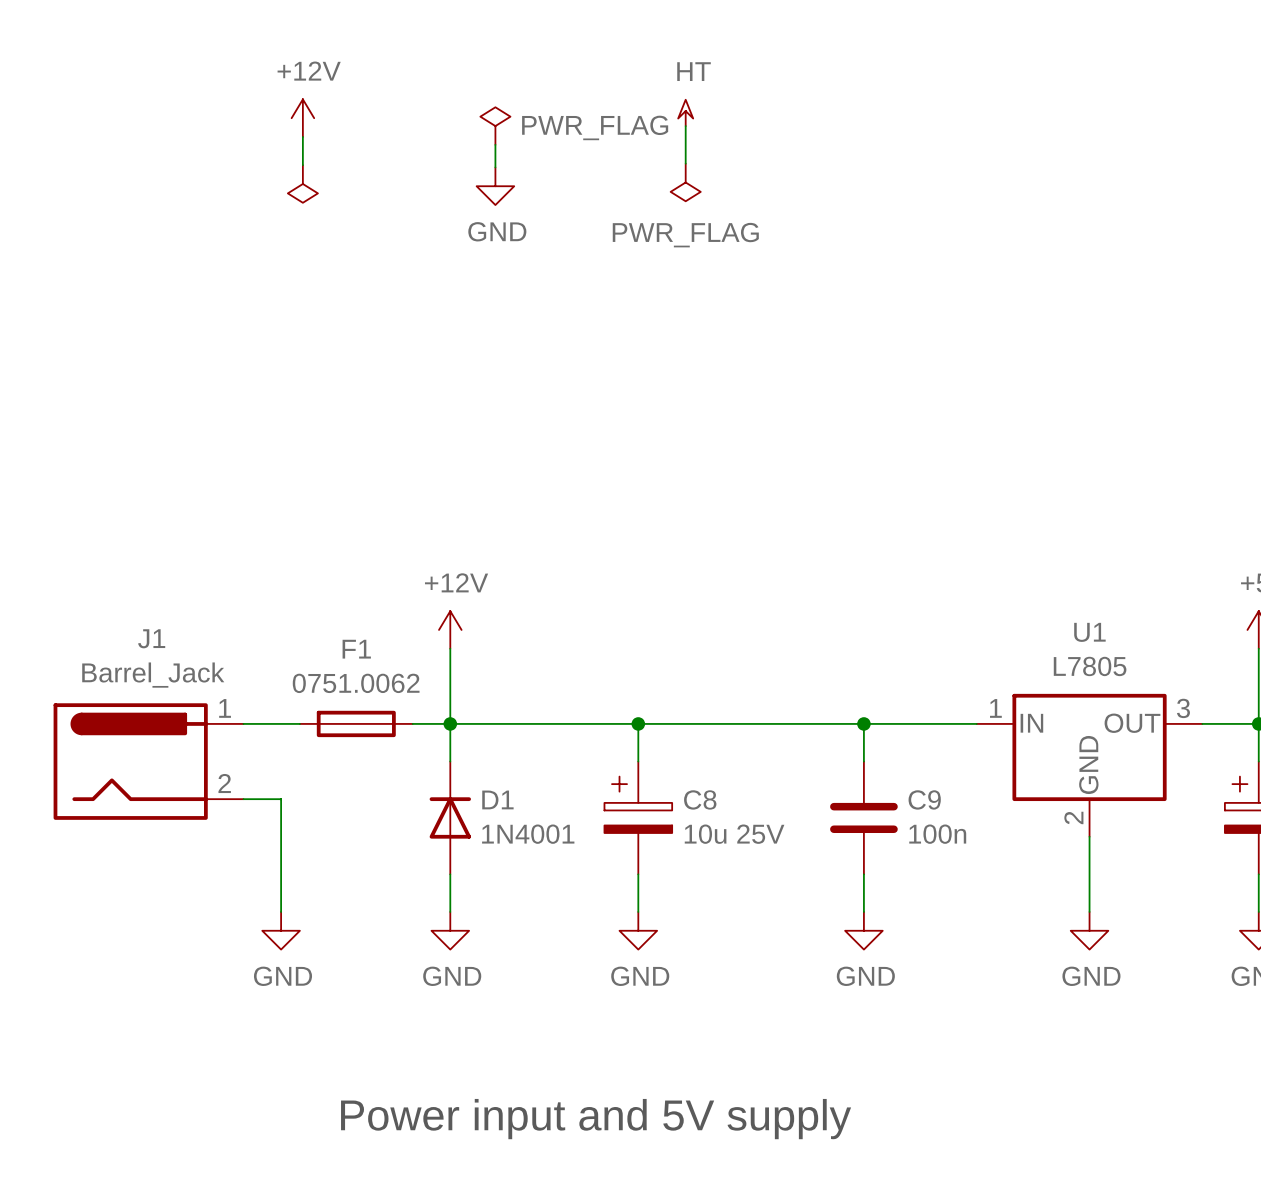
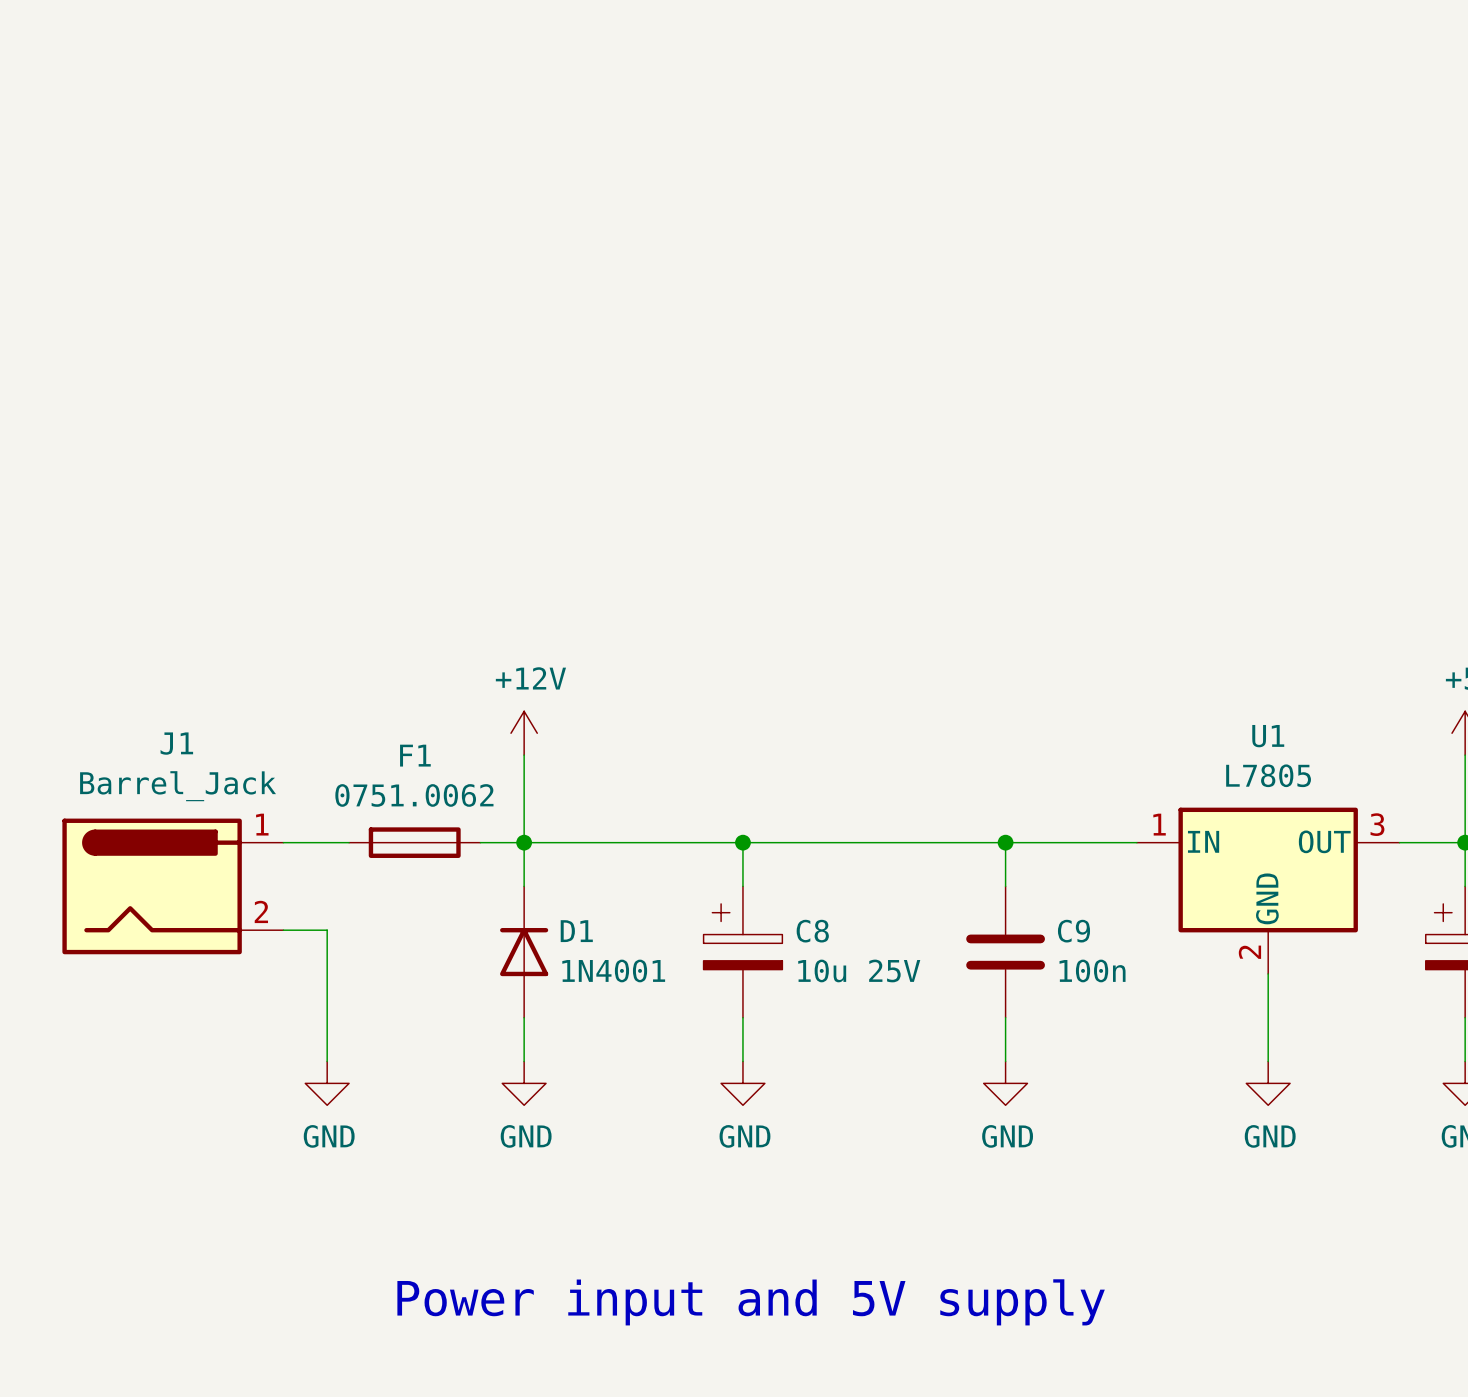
power symbol: HT (685, 112) -> none
power symbol: +12V (302, 118) -> none
power symbol: PWR_FLAG (495, 126) -> none
wire: (685, 126) (685, 163) -> none
wire: (302, 136) (302, 165) -> none
wire: (495, 144) (495, 167) -> none
power symbol: PWR_FLAG (685, 182) -> none
power symbol: (302, 183) -> none
power symbol: GND (495, 186) -> none

